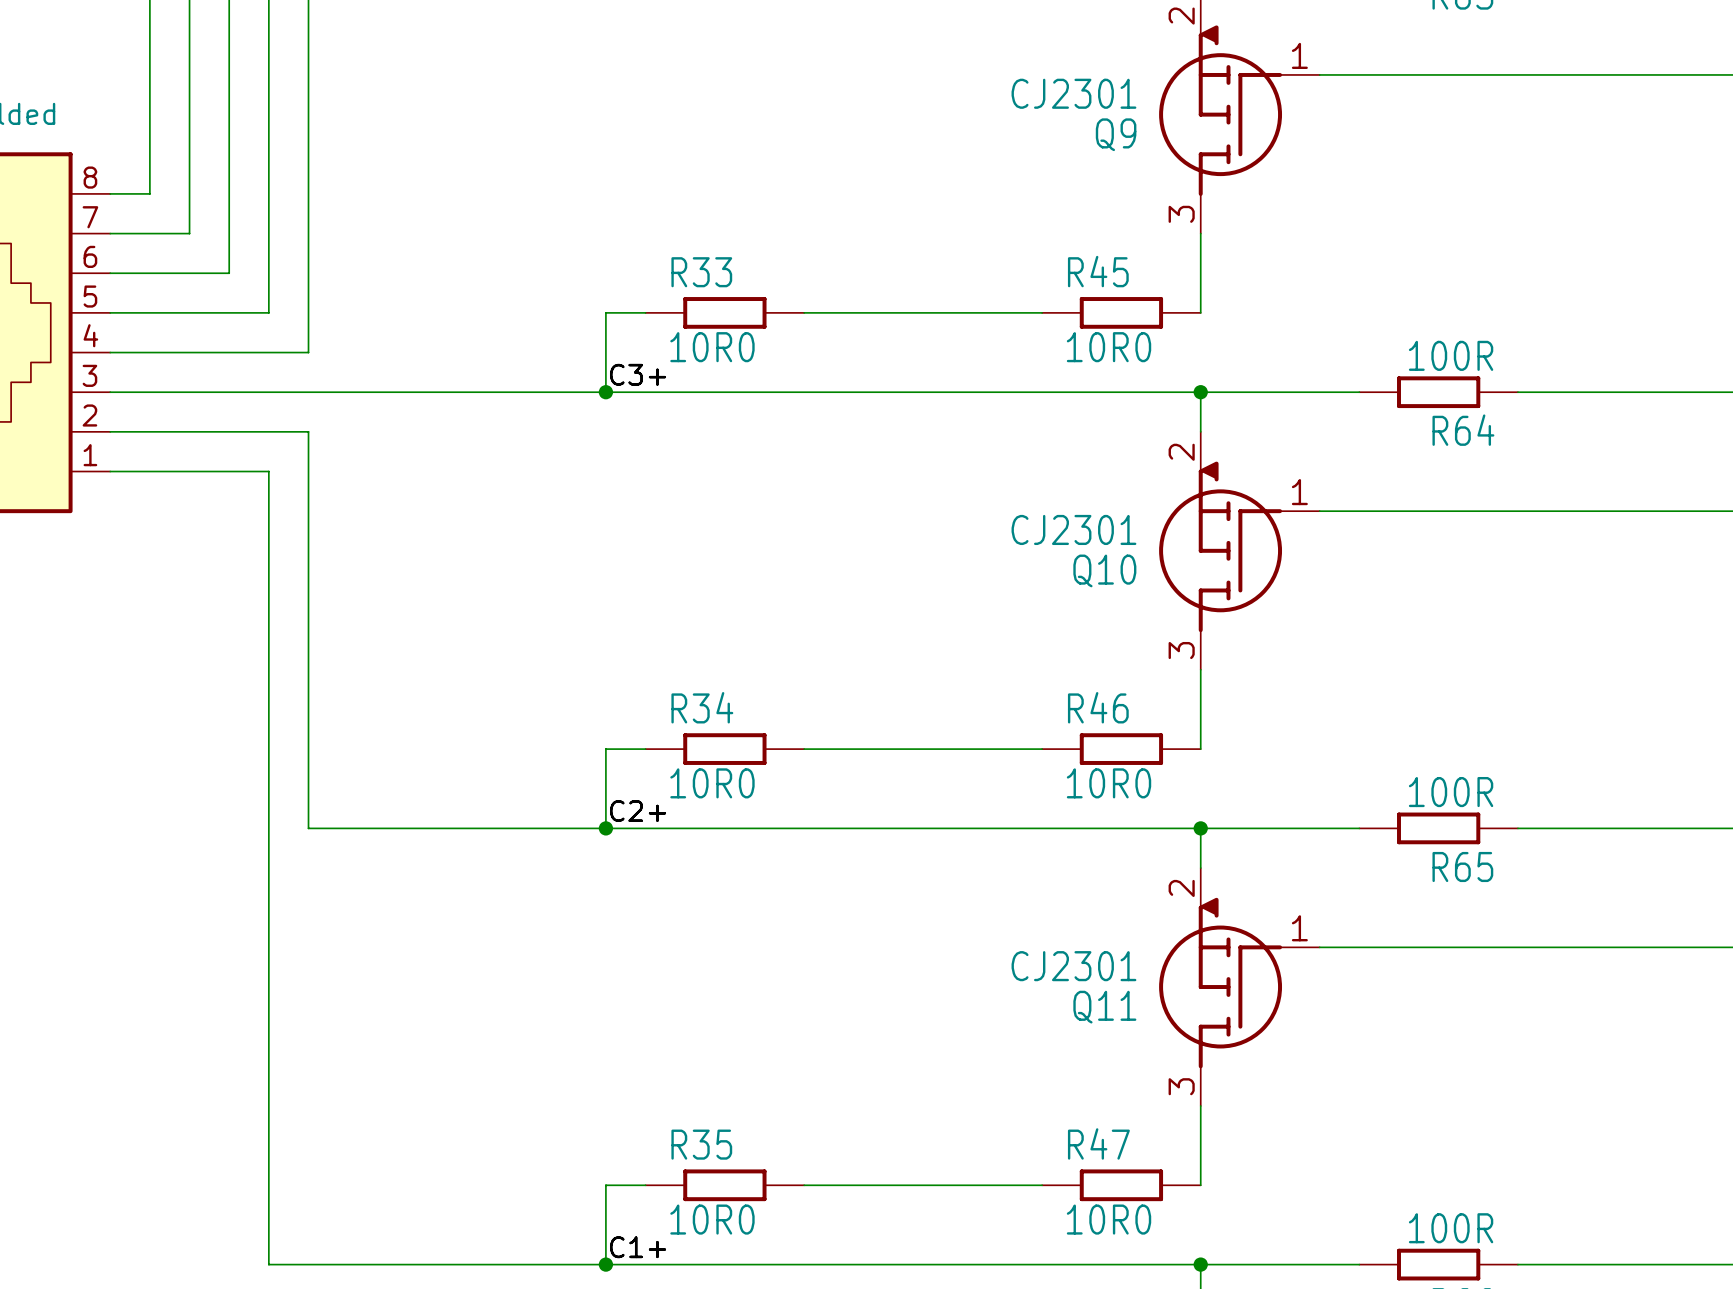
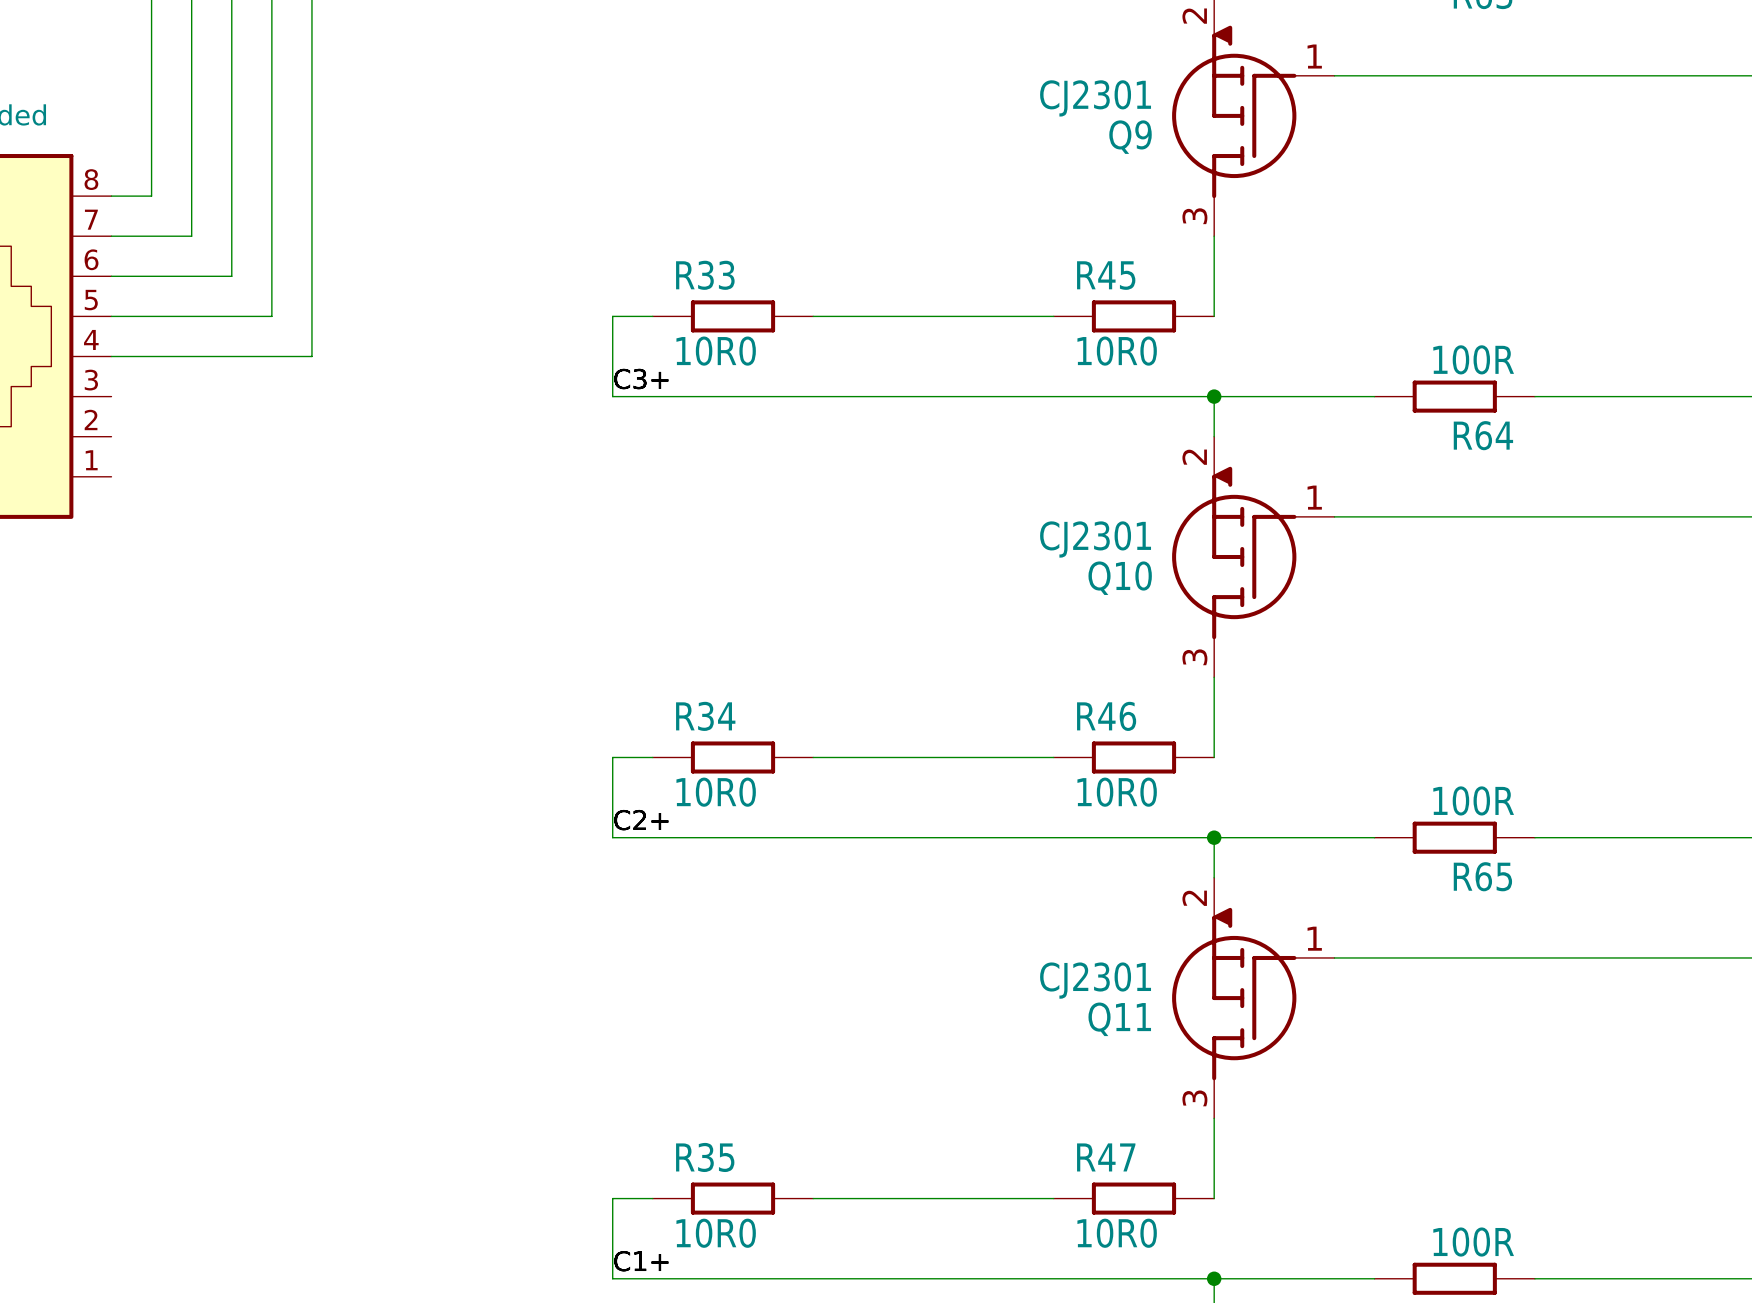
wire: (110, 392) (605, 392) -> none
junction: (605, 392) -> none
wire: (110, 431) (308, 431) (308, 828) (605, 828) -> none
wire: (110, 471) (268, 471) (268, 1264) (605, 1264) -> none
junction: (605, 828) -> none
junction: (605, 1264) -> none

